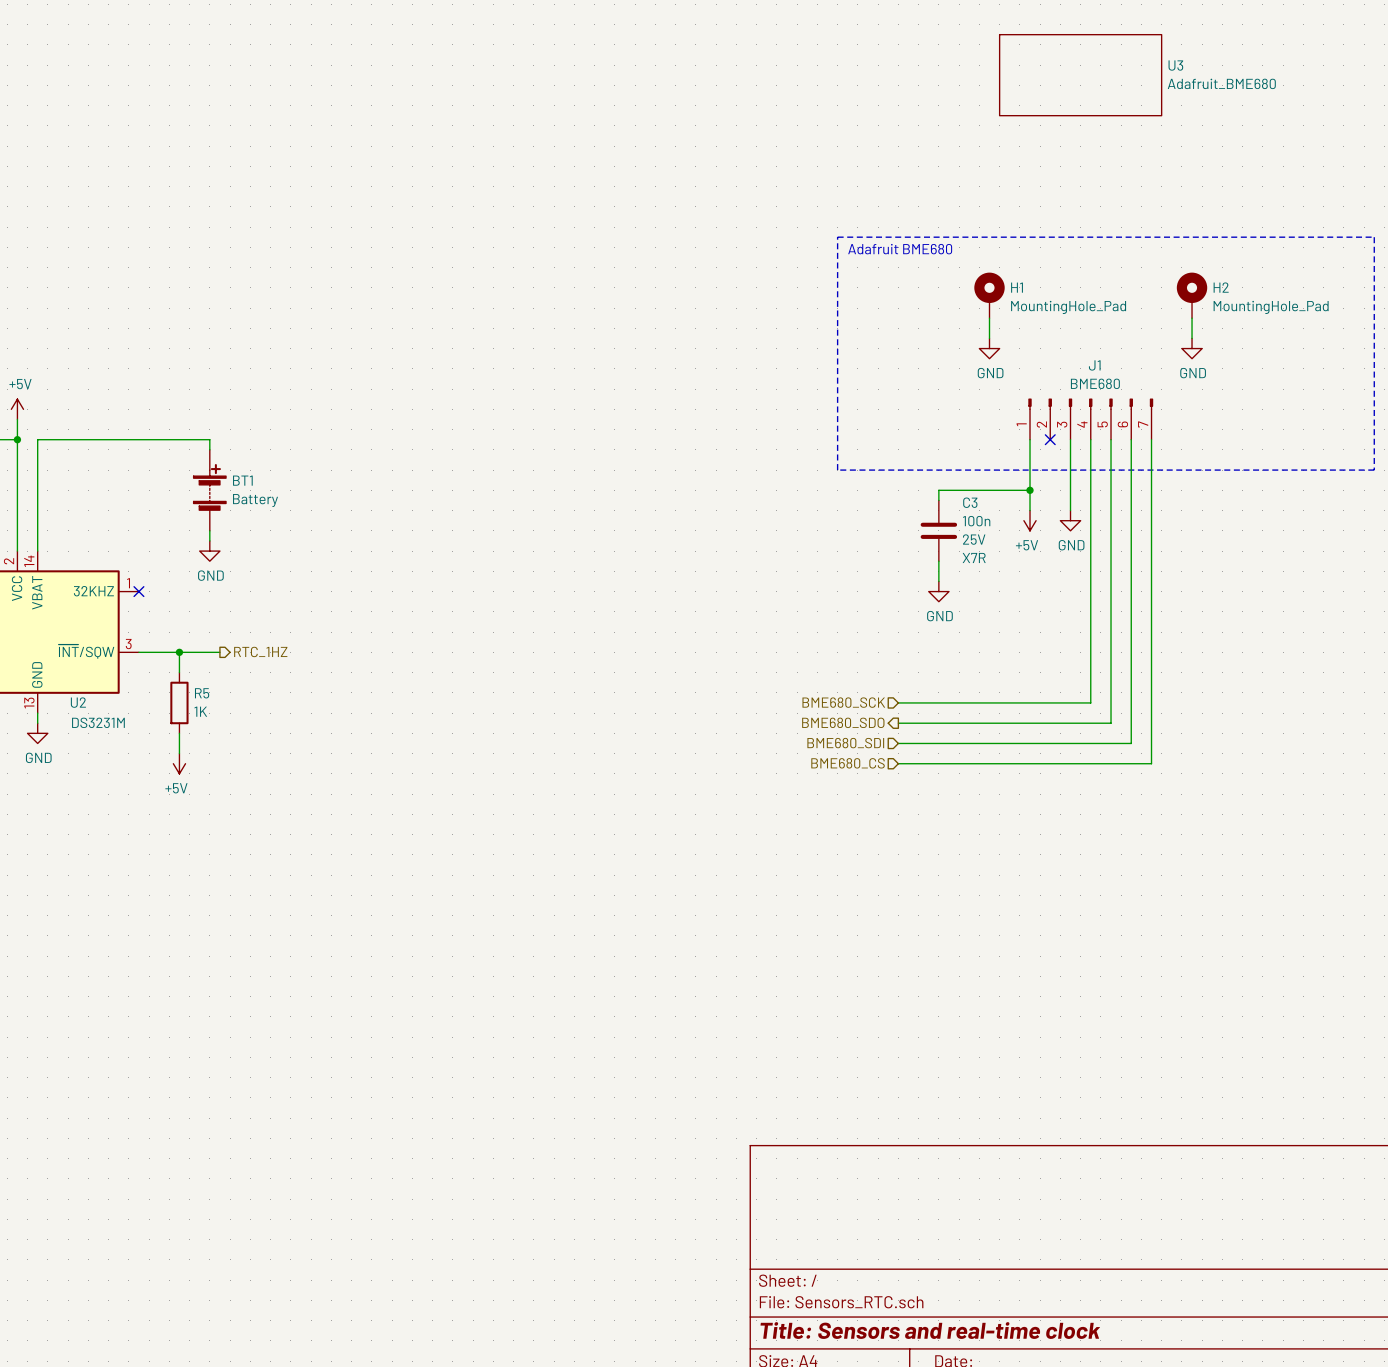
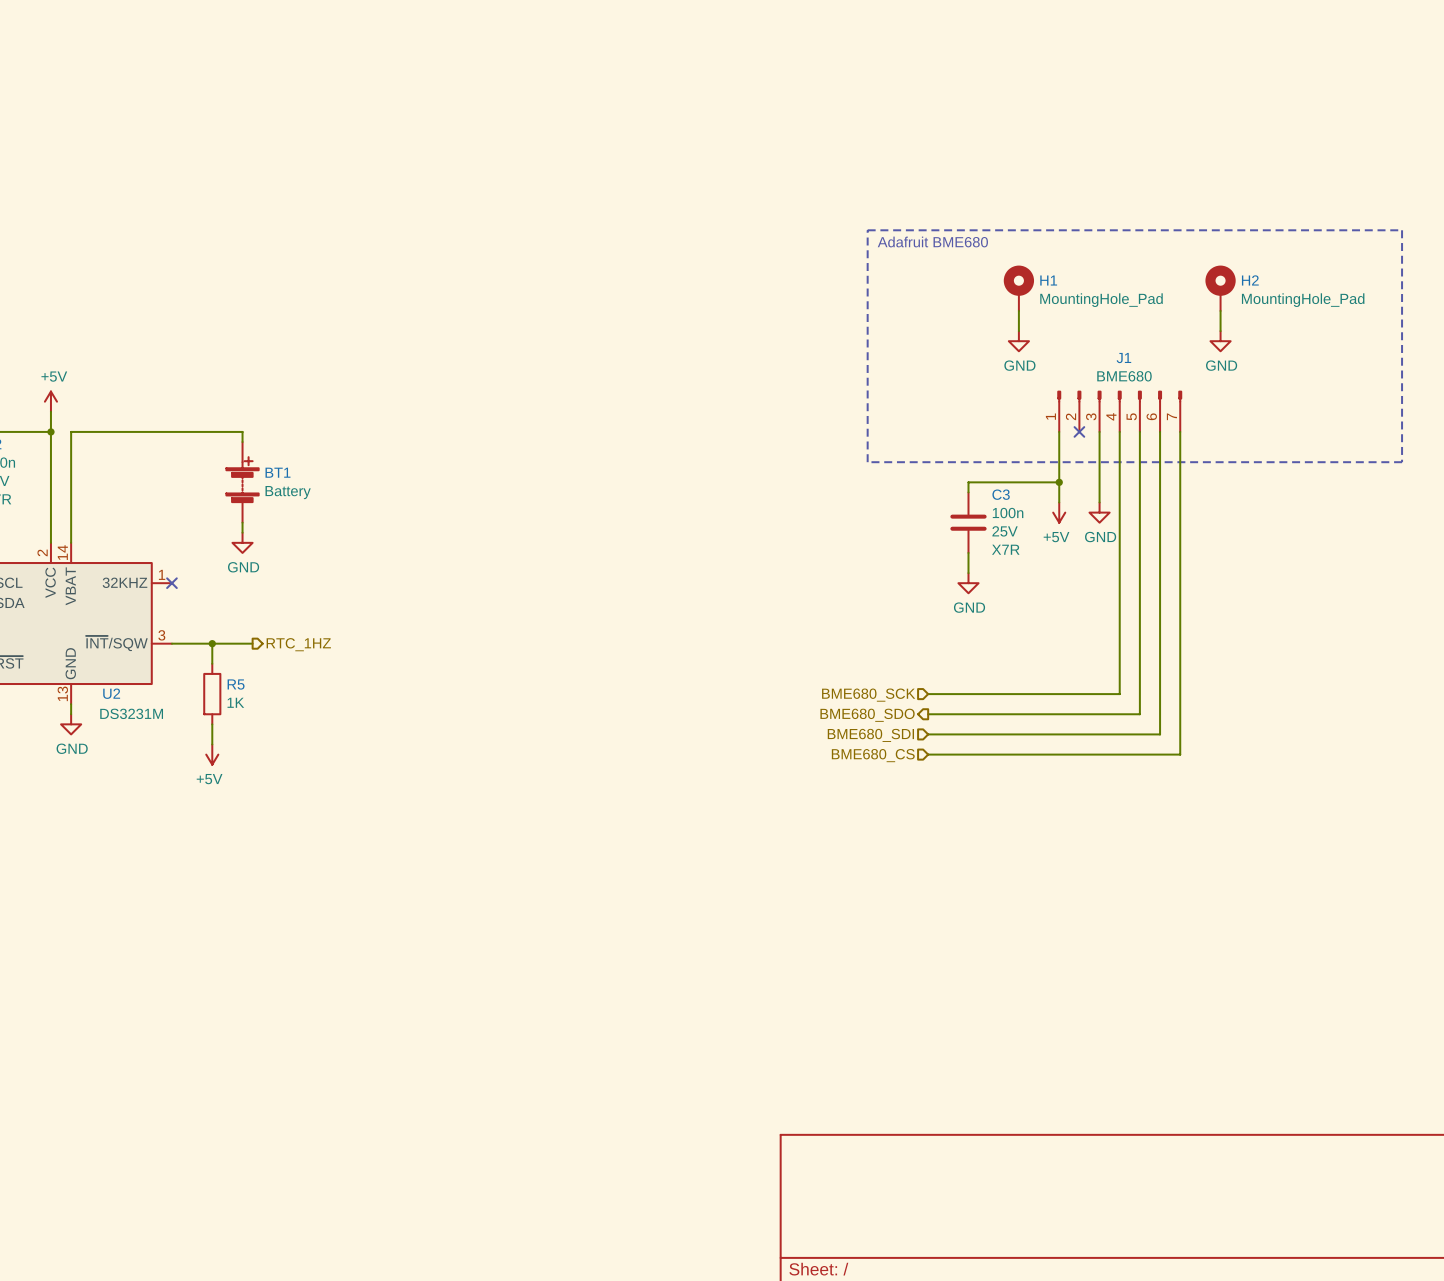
U3: Adafruit_BME680 (1080, 75) -> none

